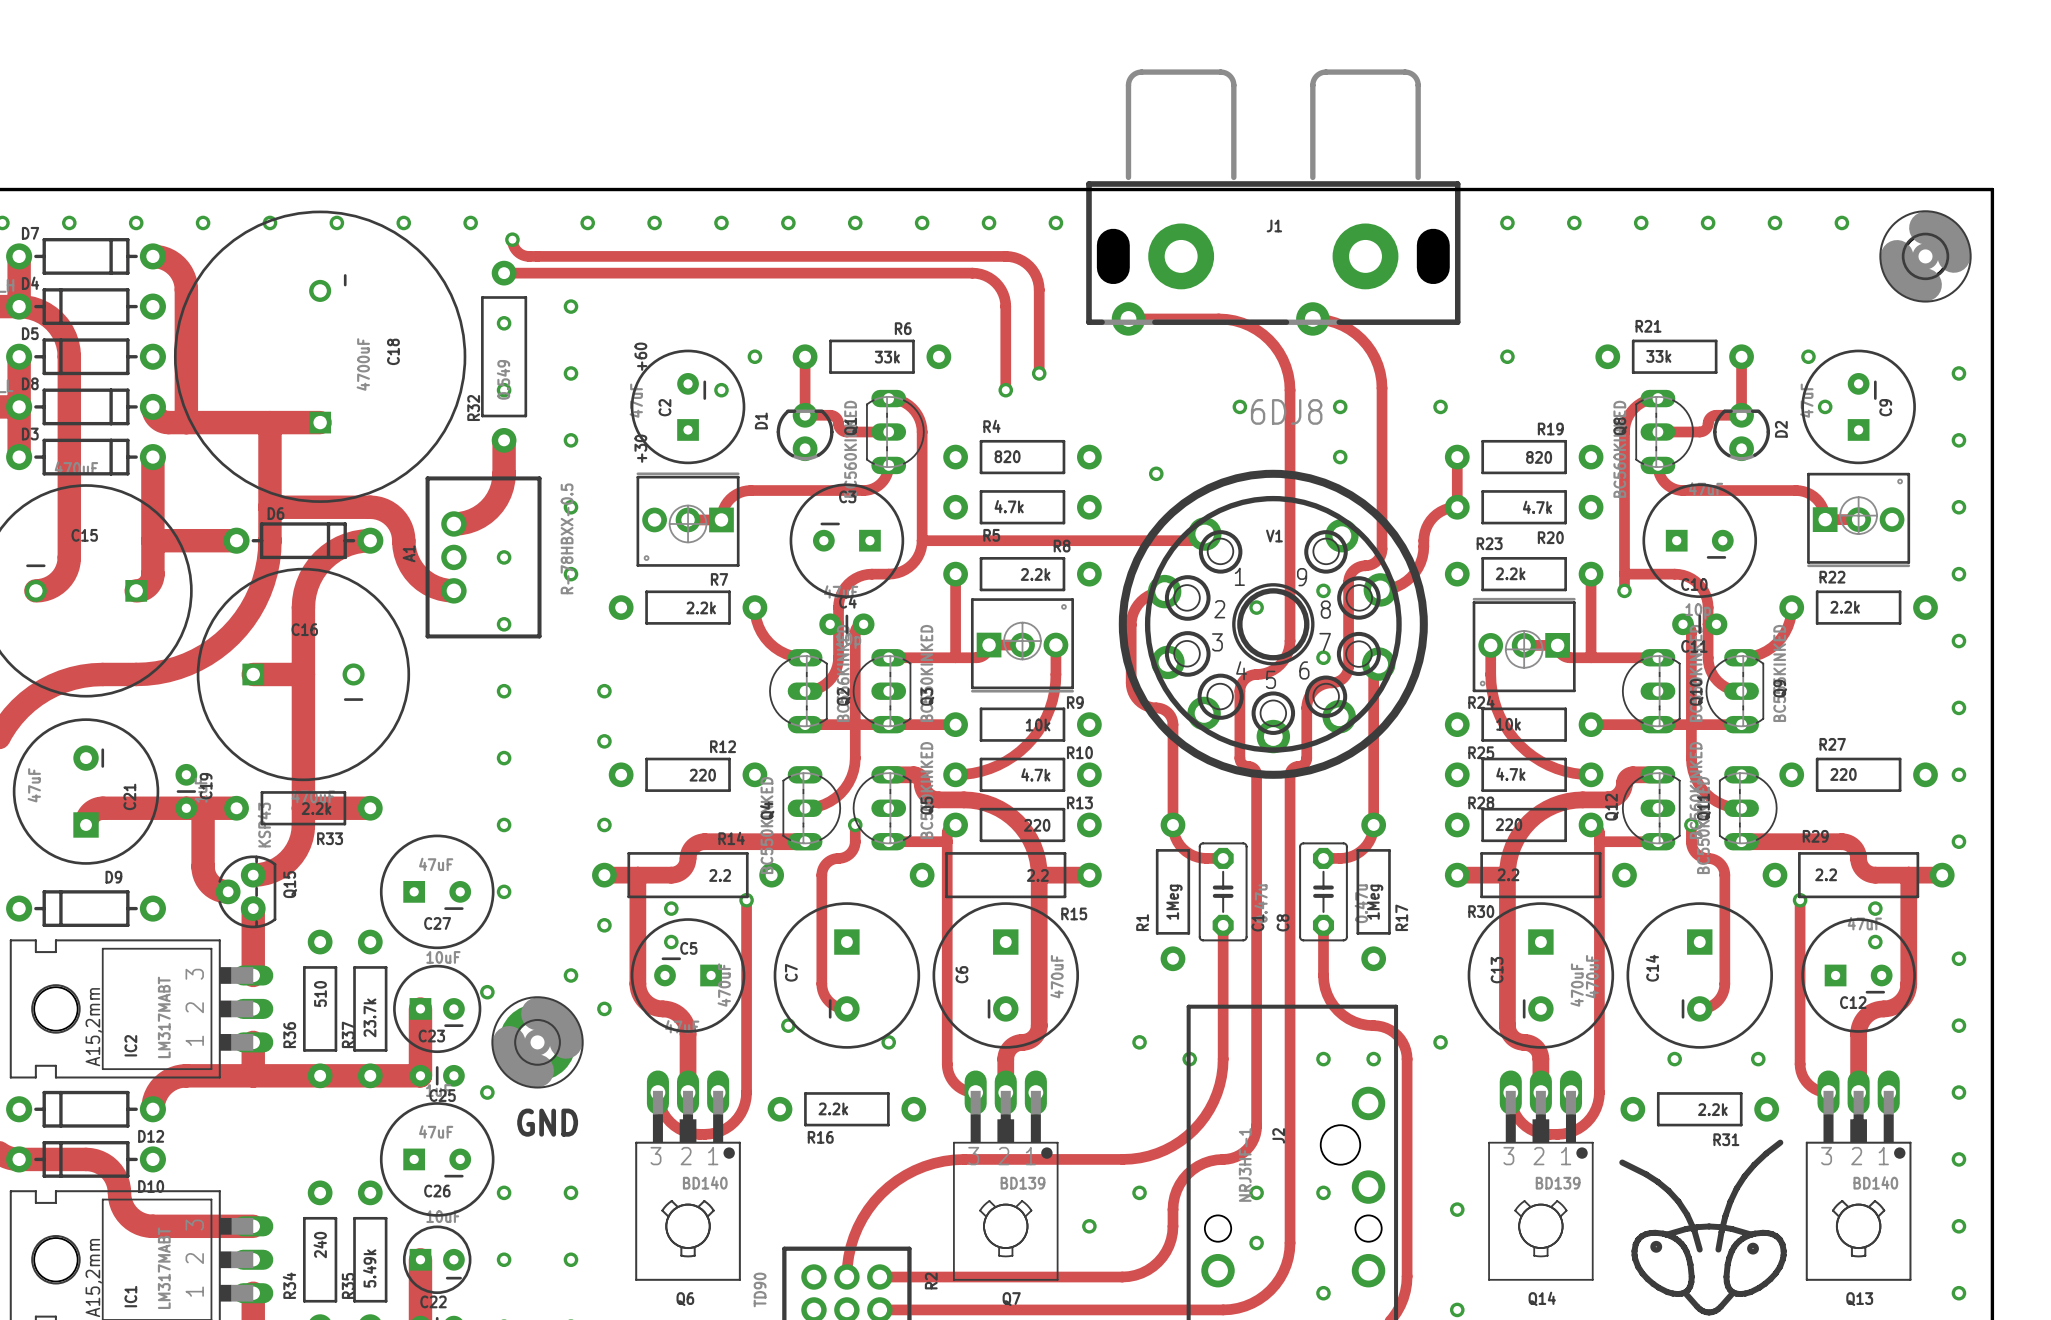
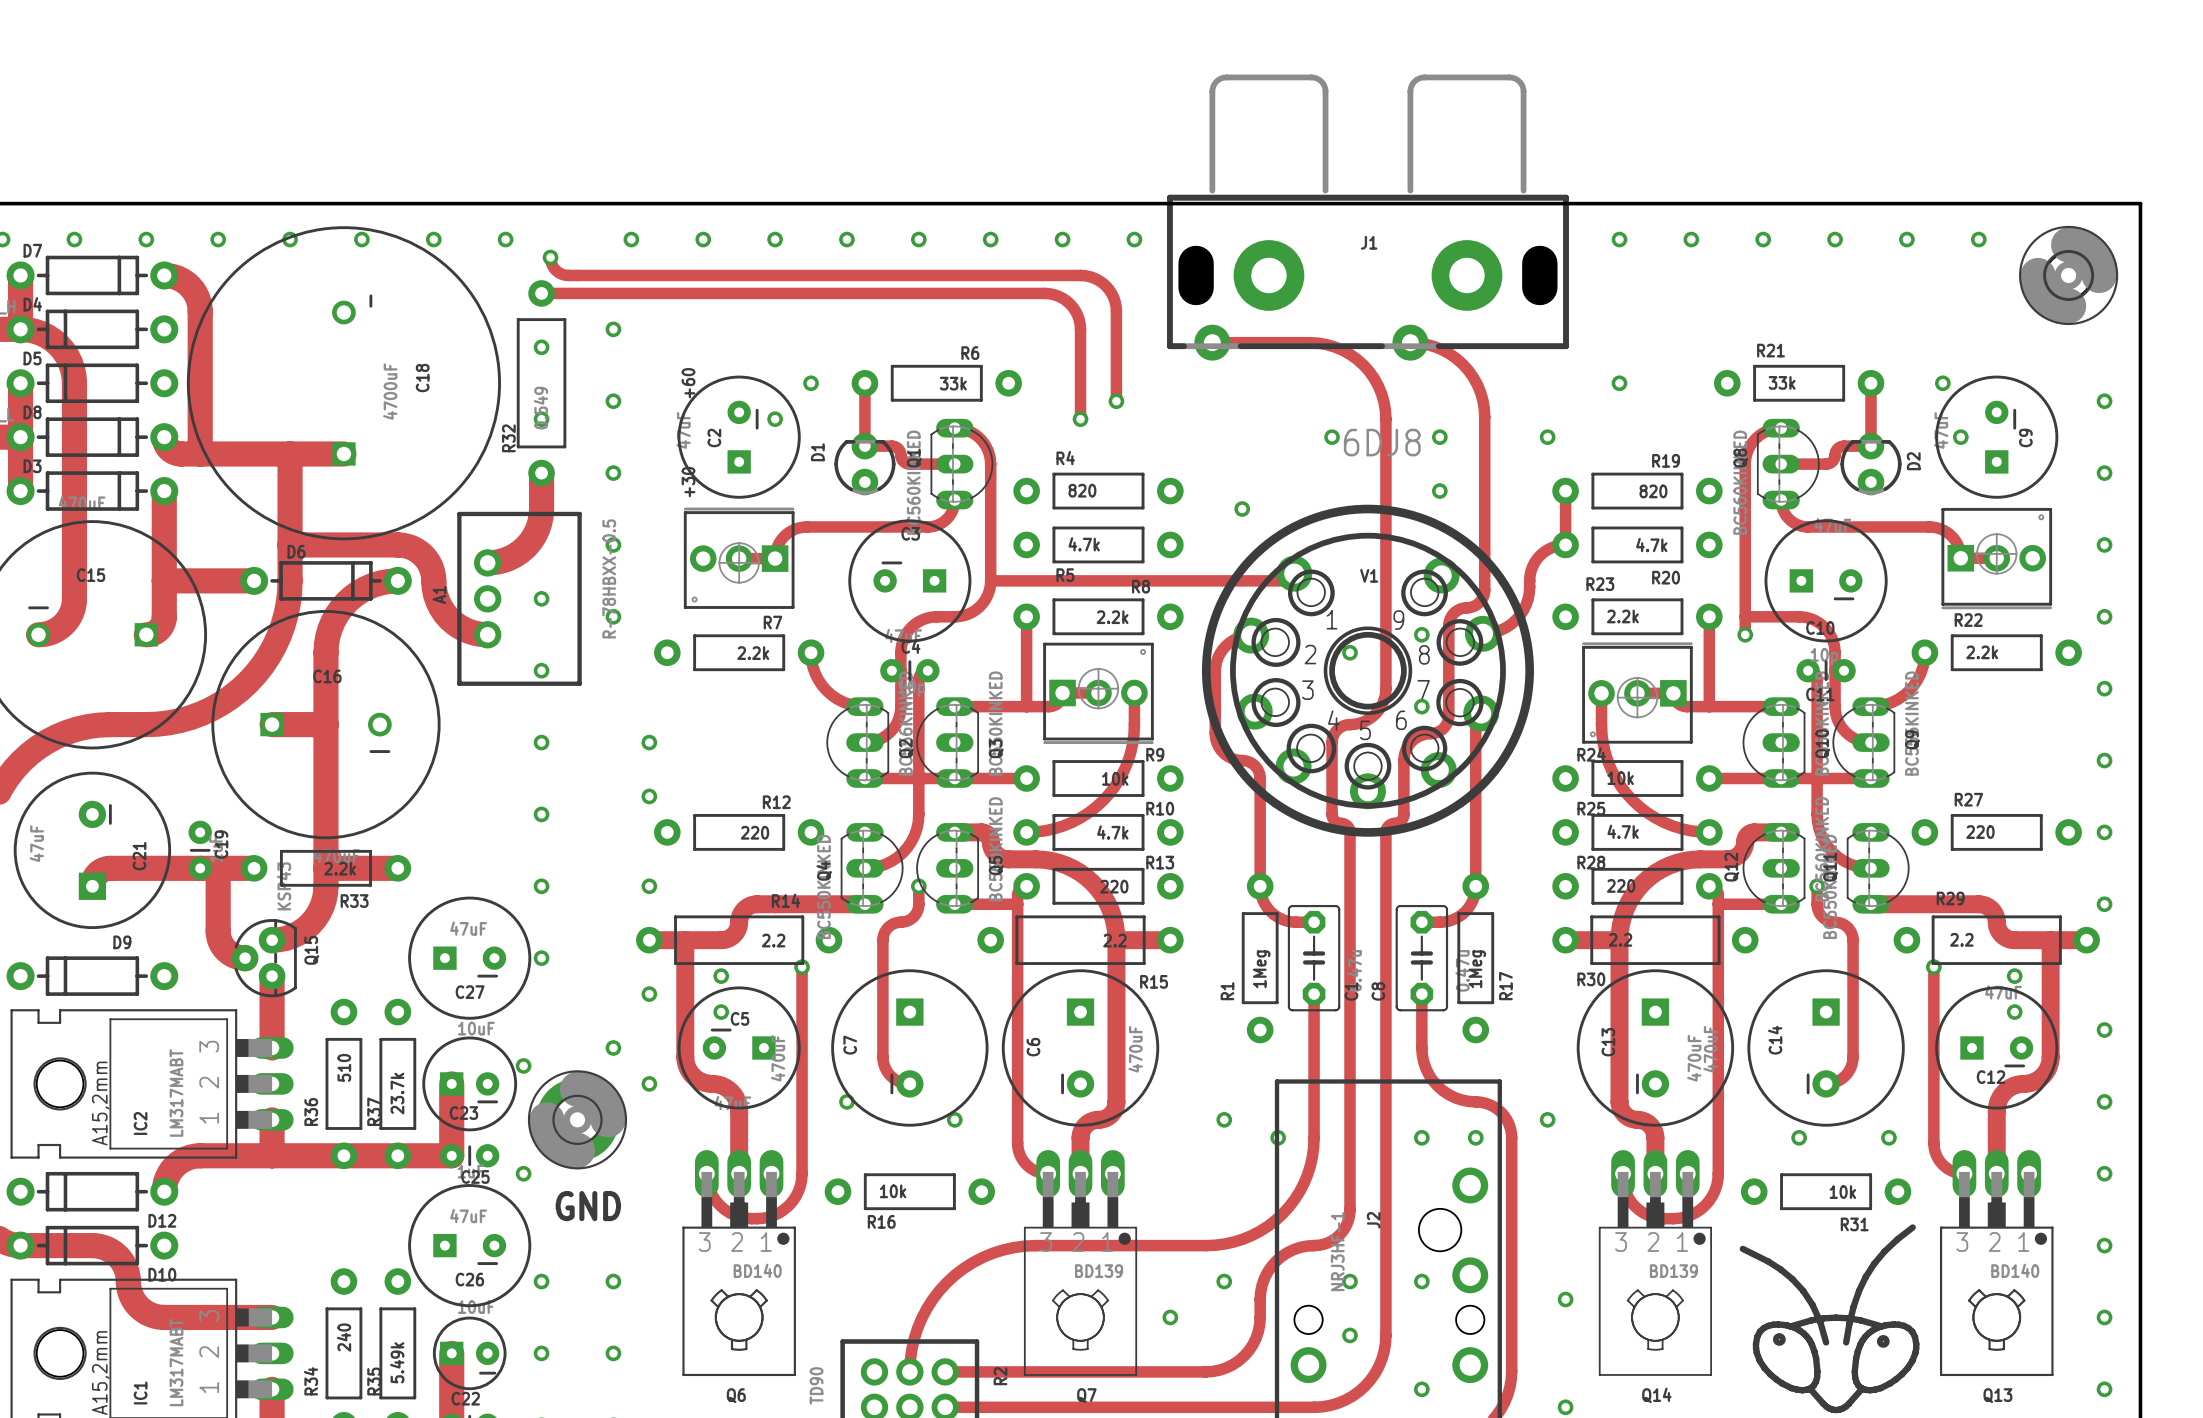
R16 value: 2.2k (833, 1108) -> 10k (893, 1191)
R31 value: 2.2k (1712, 1109) -> 10k (1842, 1192)

